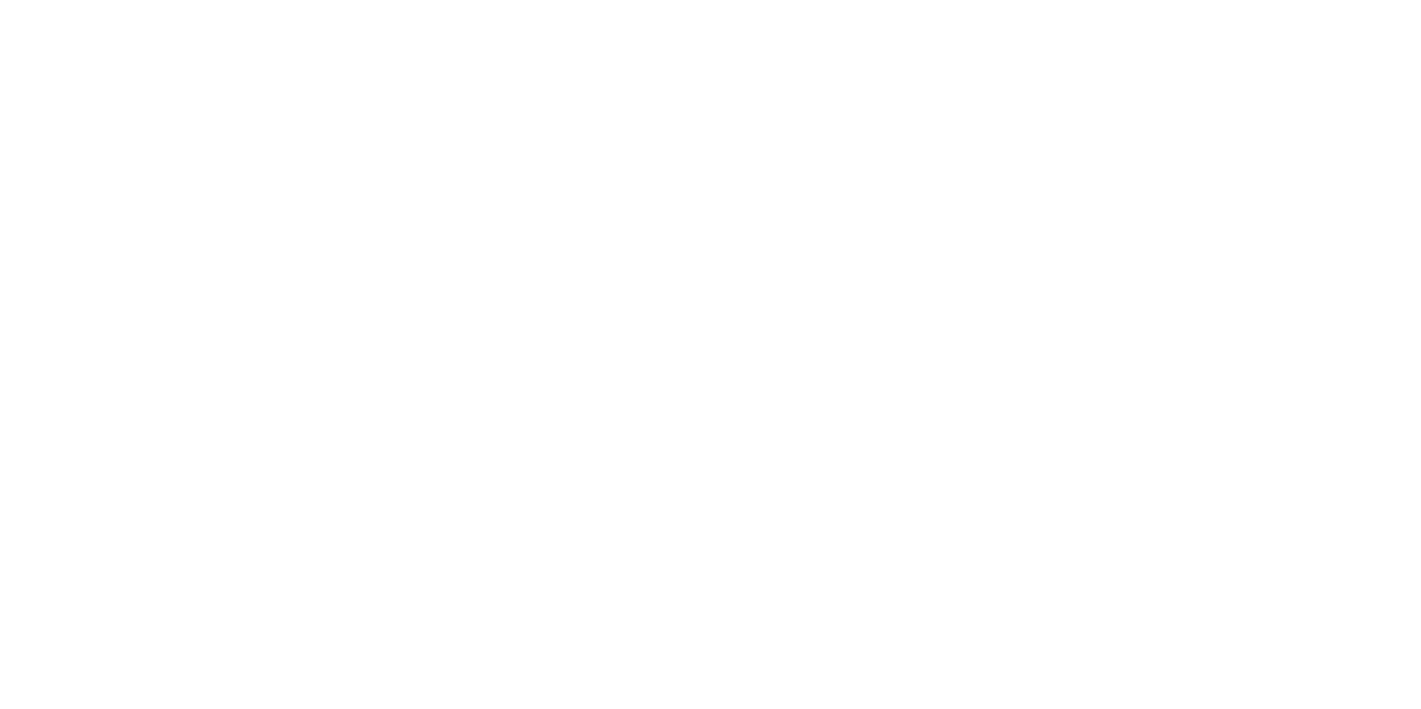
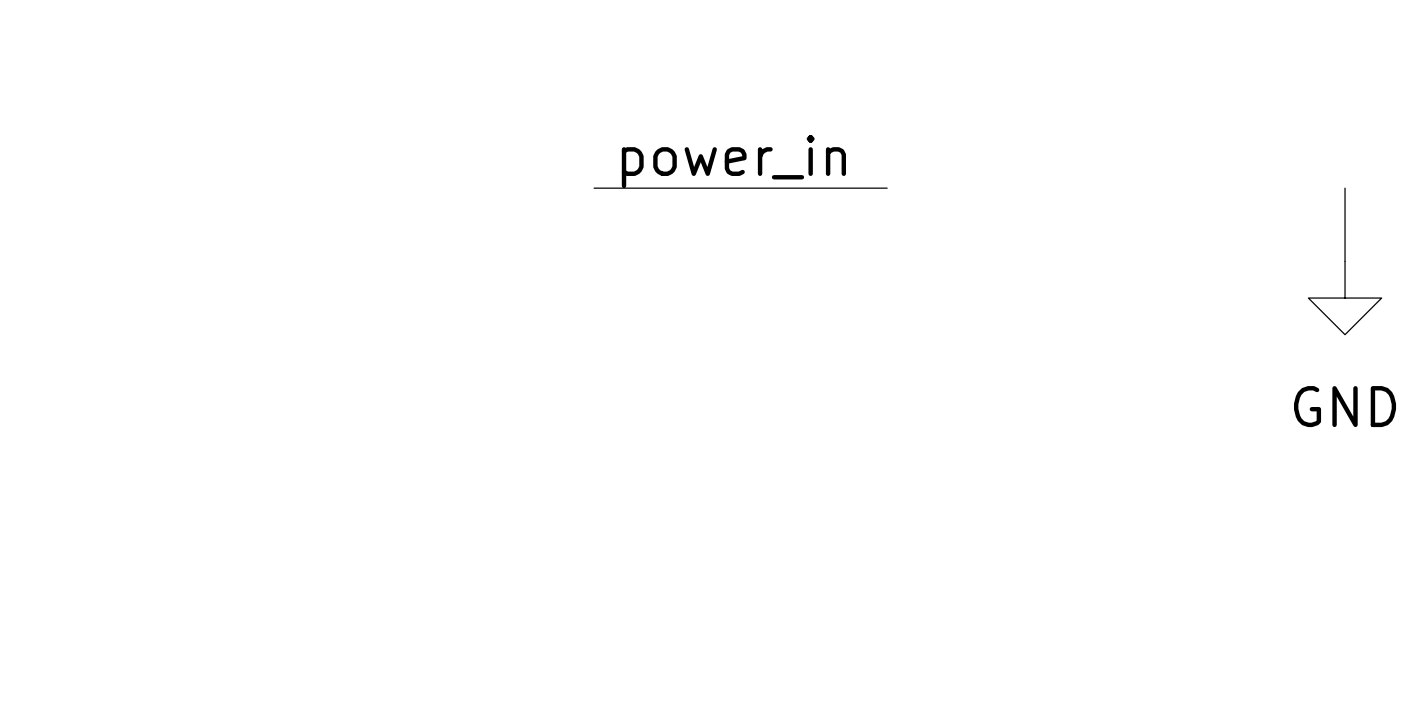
label: none -> power_in (733, 161)
wire: none -> (594, 188) (887, 188)
wire: none -> (1345, 188) (1345, 261)
power symbol: none -> GND (1345, 298)

